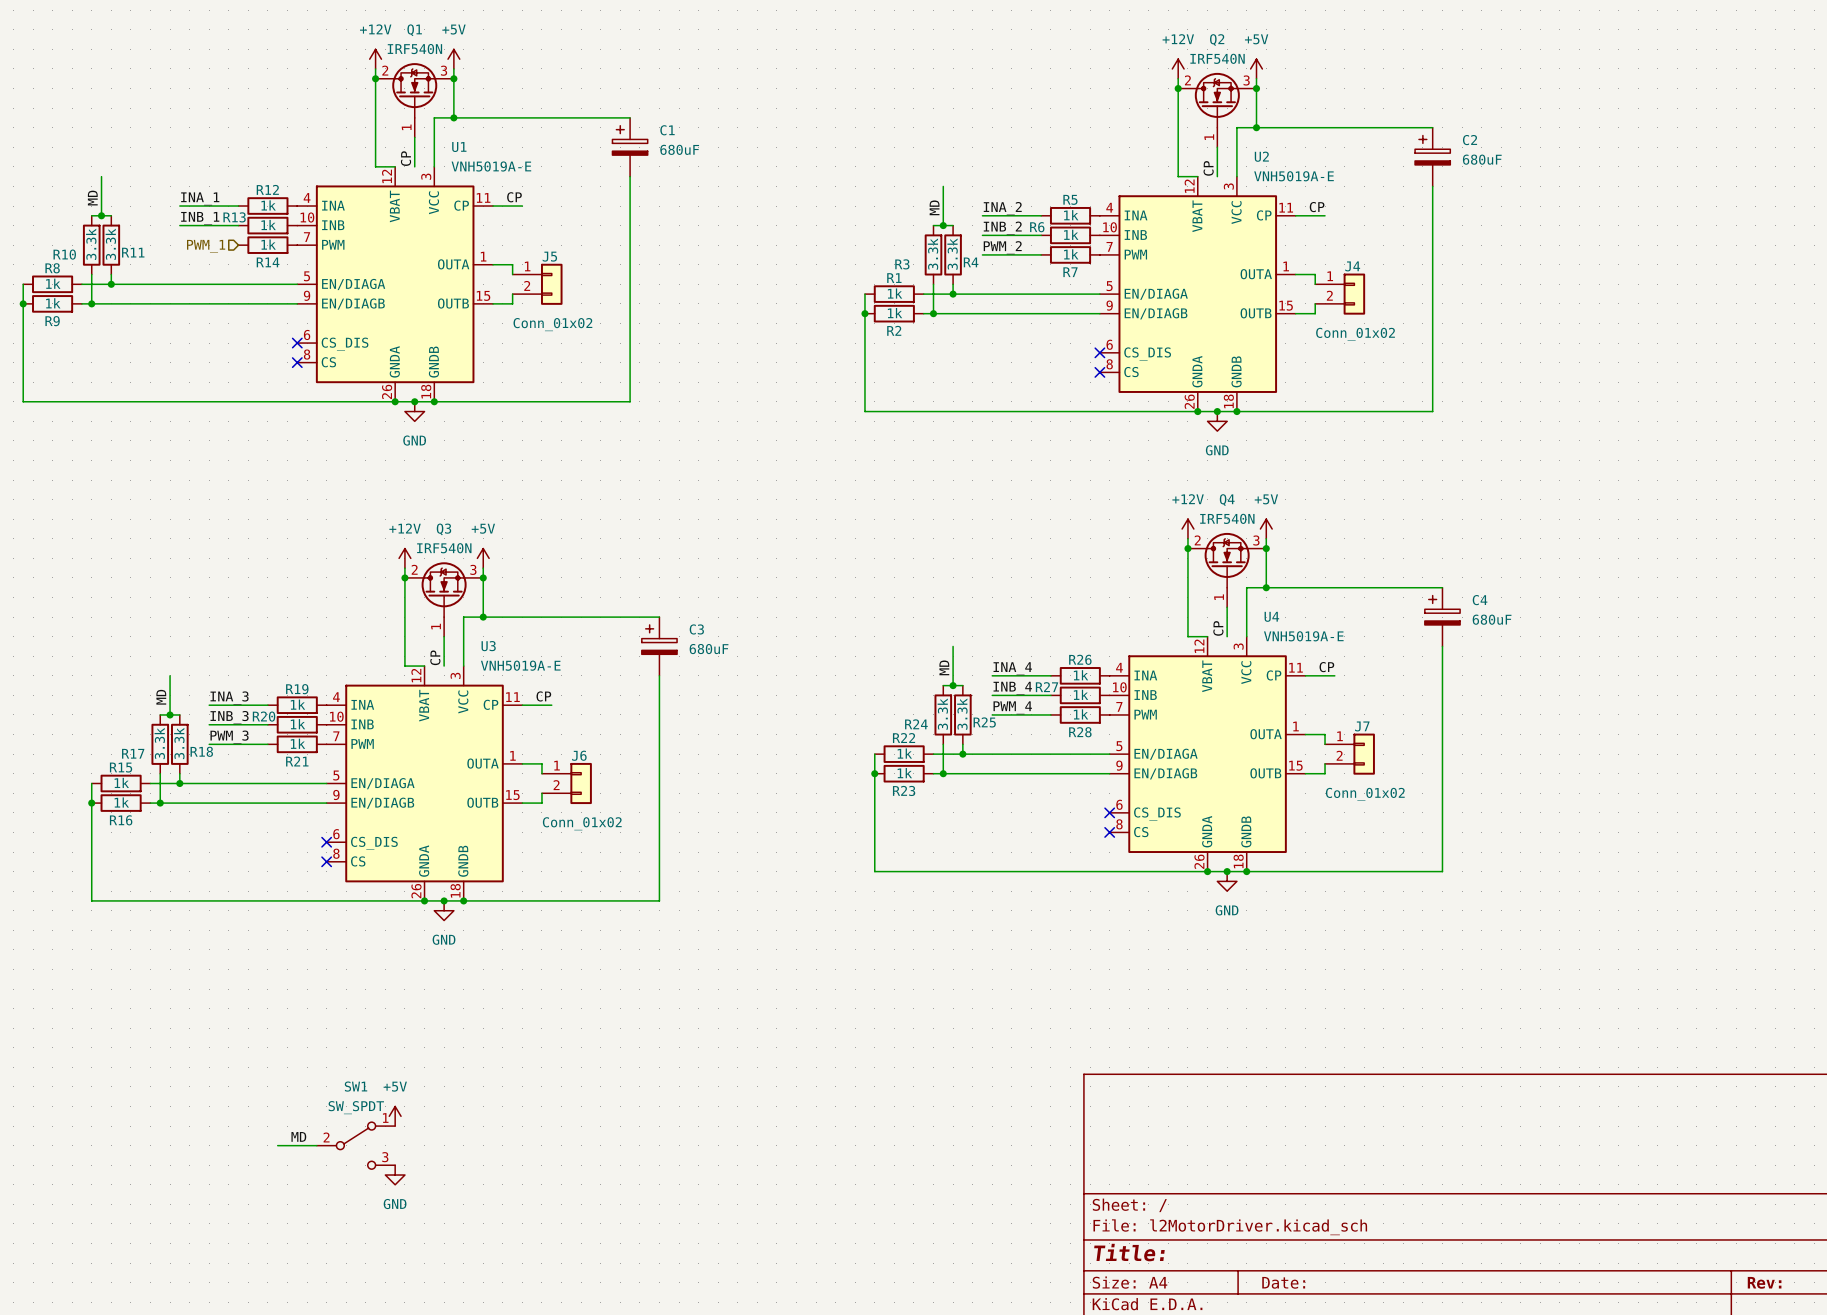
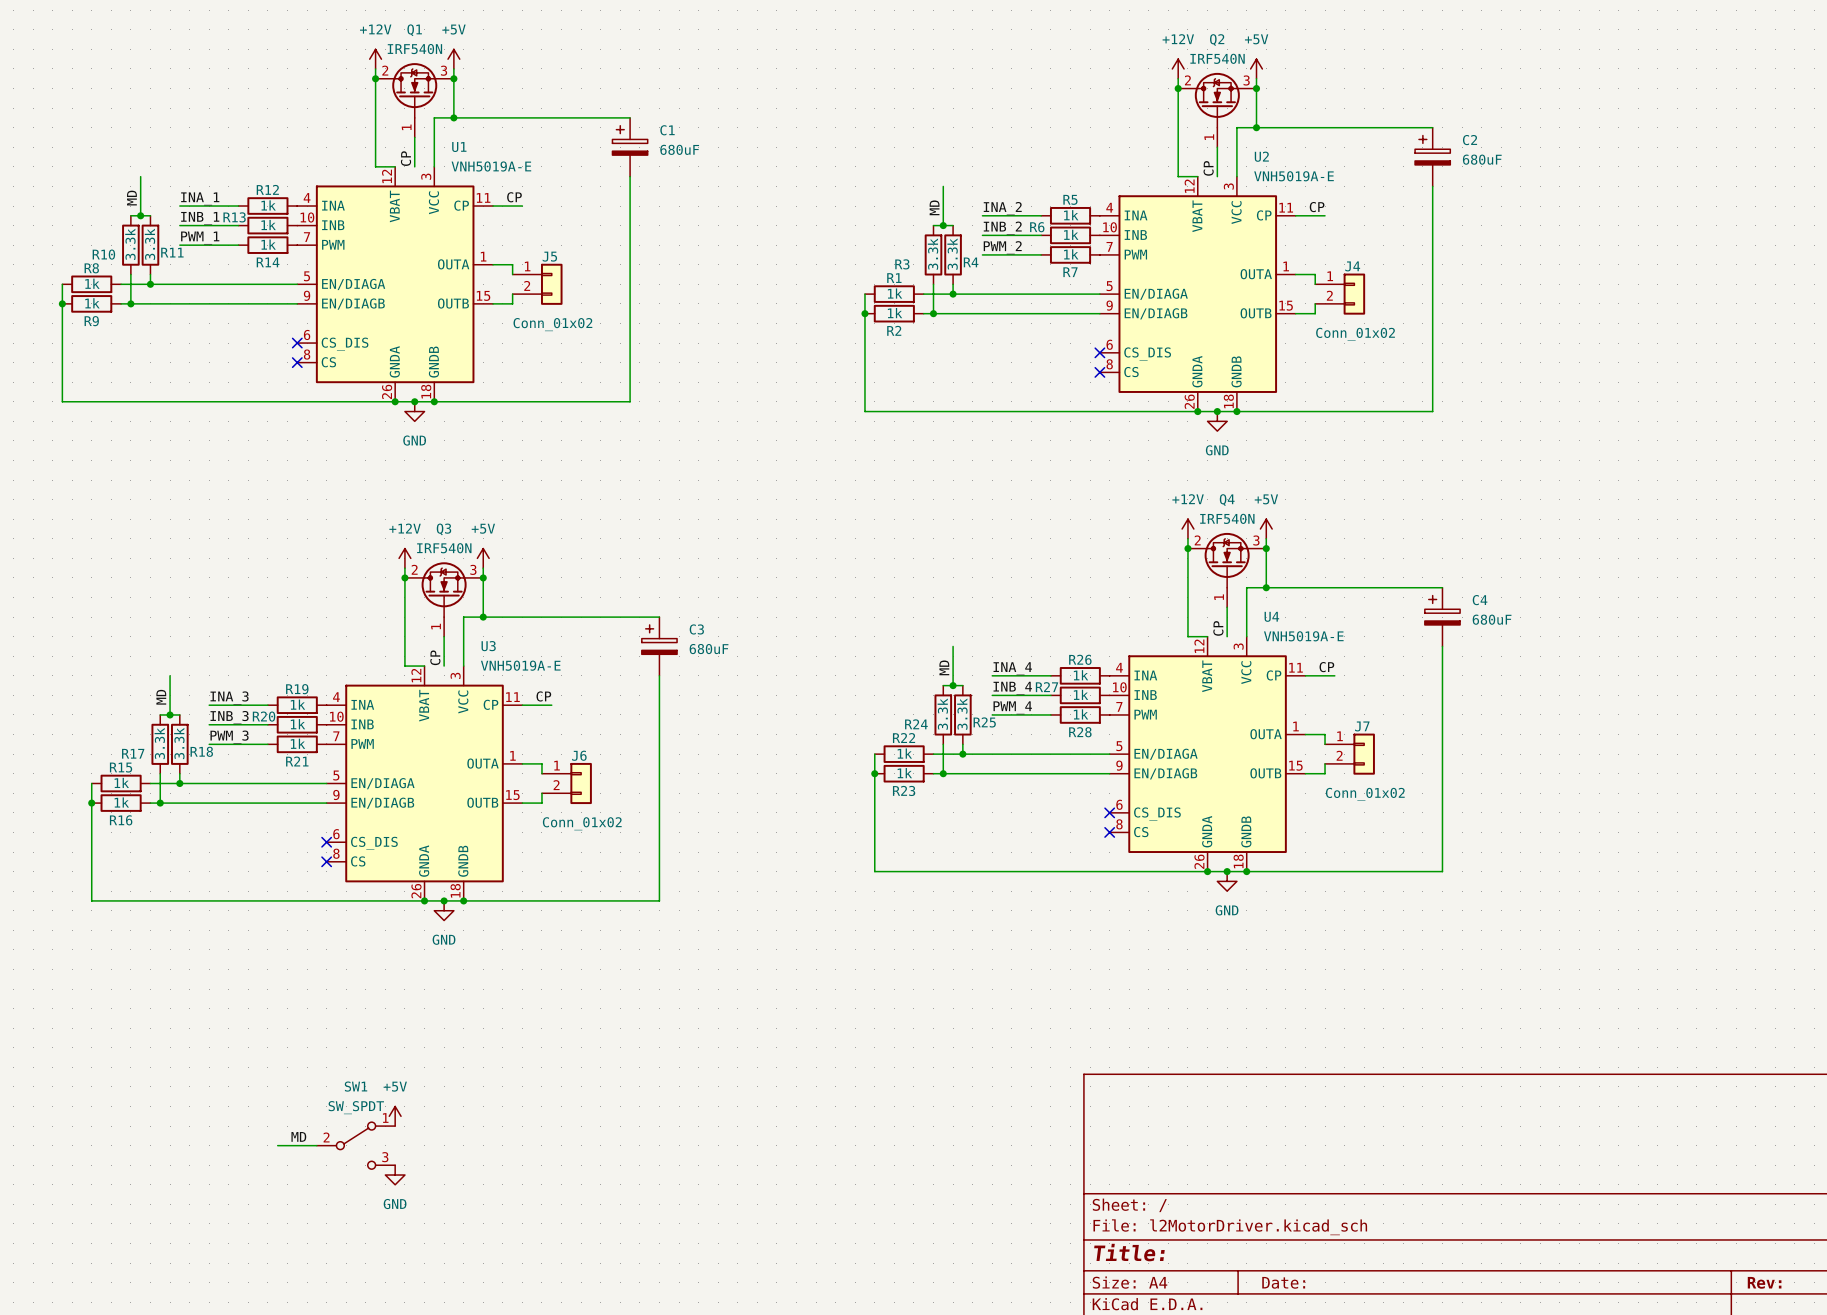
wire: (101, 176) (101, 215) -> (140, 176) (140, 215)
label position: MD (92, 198) -> MD (131, 198)
wire: (91, 215) (111, 215) -> (130, 215) (150, 215)
junction: (101, 215) -> none
junction: none -> (140, 215)
label: none -> PWM_1 (200, 238)
R10 position: (91, 245) -> (130, 245)
R11 position: (111, 245) -> (150, 245)
wire: none -> (179, 245) (238, 245)
hierarchical label: PWM_1 (206, 246) -> none
wire: (91, 274) (91, 303) -> (130, 274) (130, 303)
wire: (23, 284) (23, 401) (62, 401) -> (62, 284) (62, 401)
R8 position: (52, 284) -> (91, 284)
wire: (81, 284) (121, 284) -> none
junction: (111, 284) -> none
junction: none -> (150, 284)
junction: (23, 303) -> none
R9 position: (52, 303) -> (91, 303)
junction: none -> (62, 303)
wire: (81, 303) (121, 303) -> none
junction: (91, 303) -> none
junction: none -> (130, 303)

